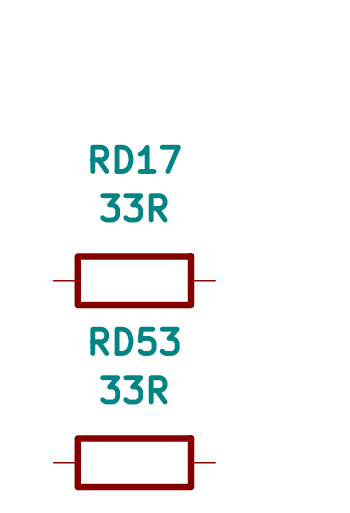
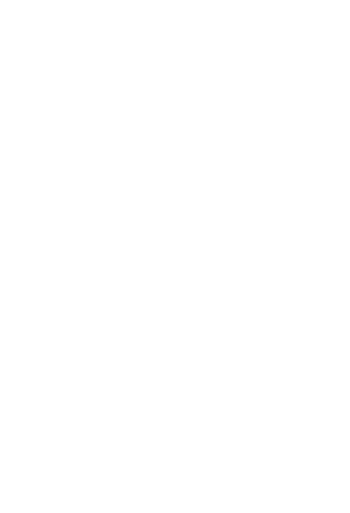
RD17: 33R (134, 280) -> none
RD53: 33R (134, 462) -> none

